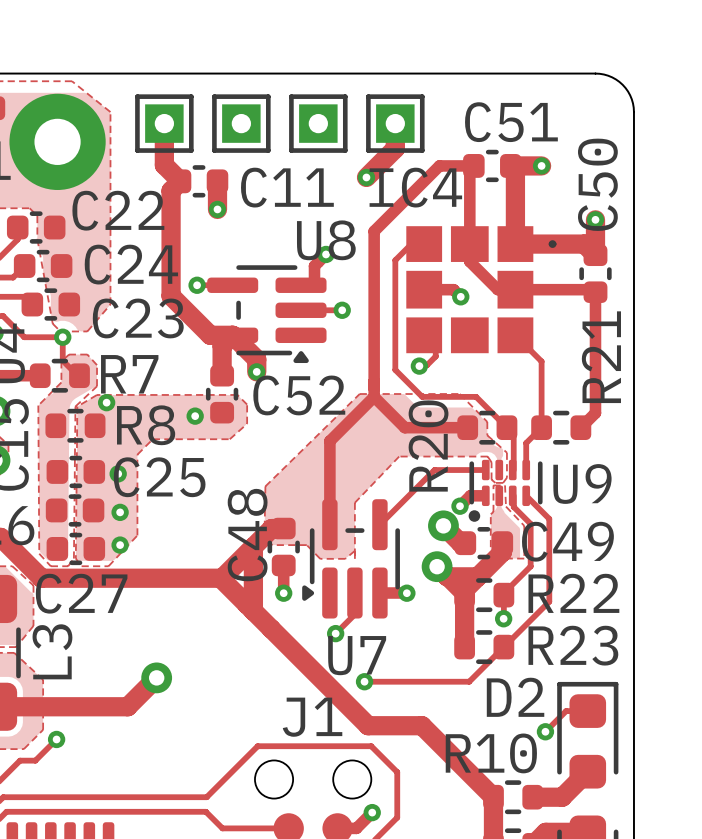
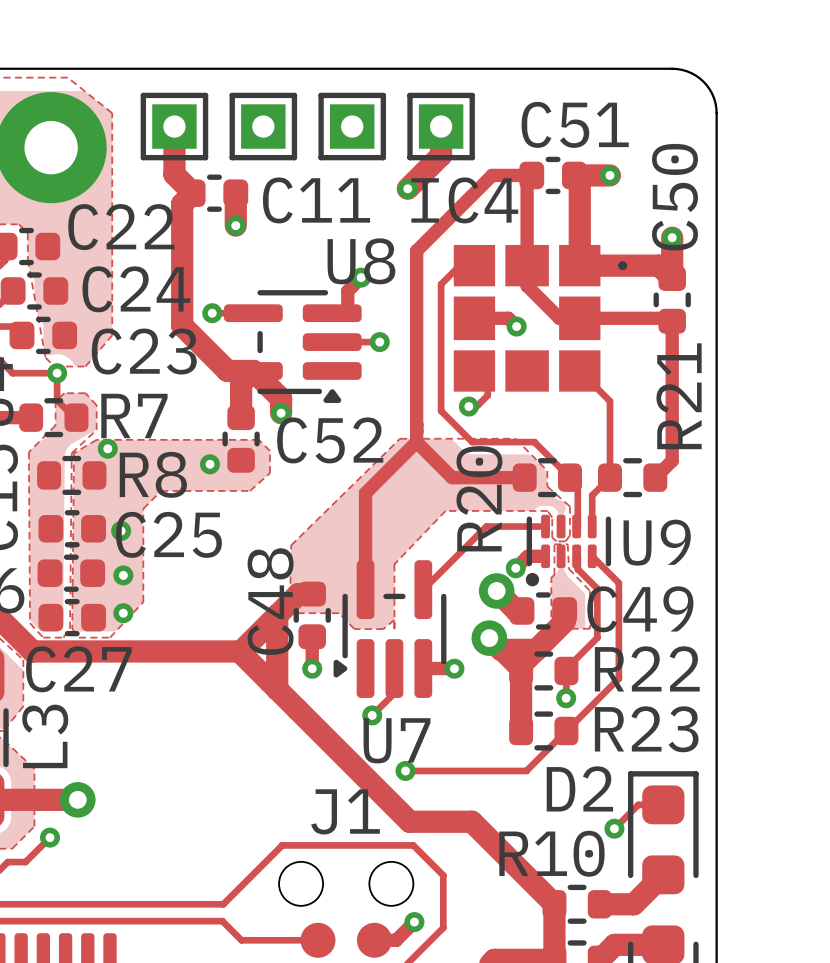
track: (156, 677) (127, 706) (80, 706) -> none
via position: (156, 677) -> (77, 799)

